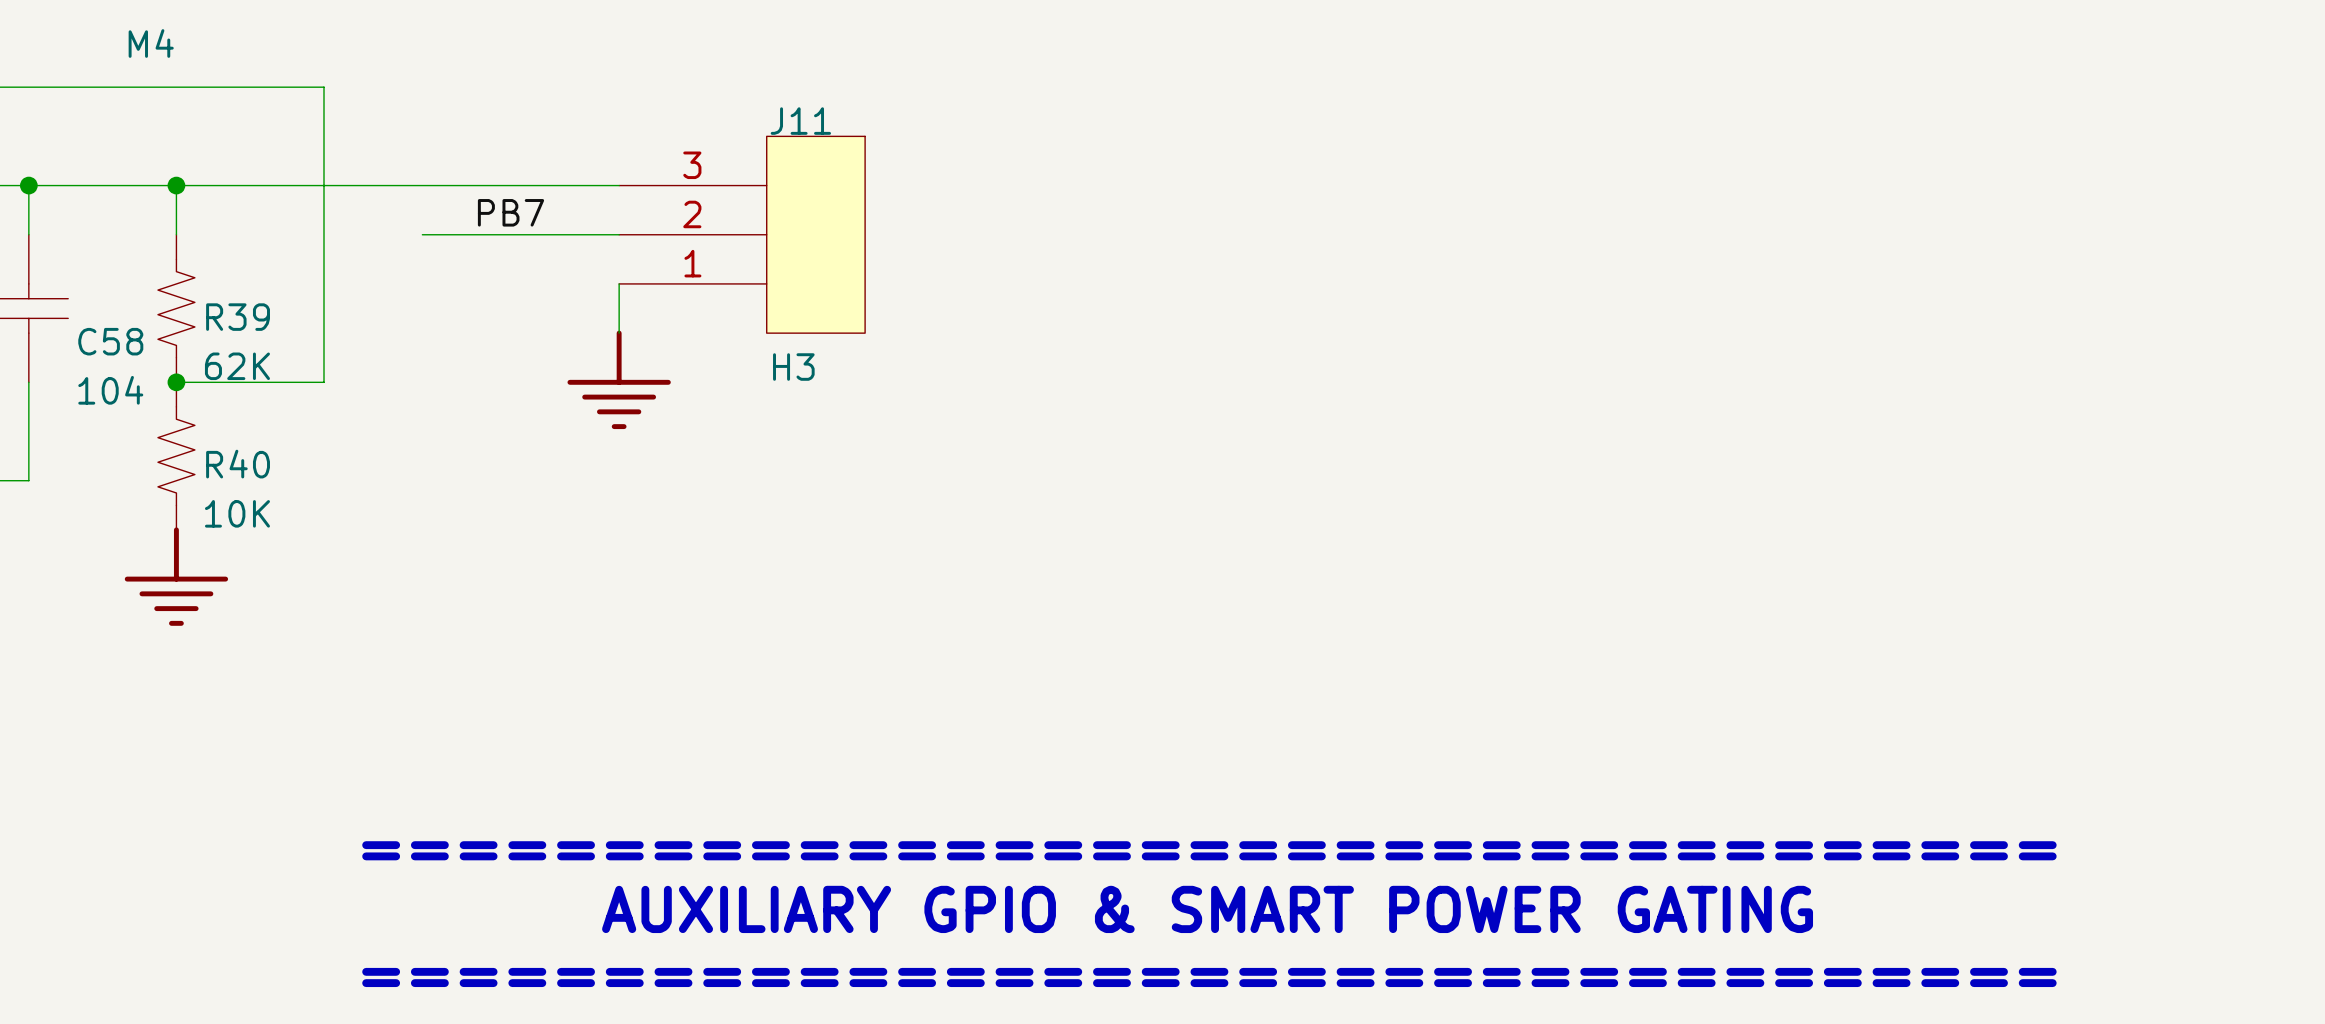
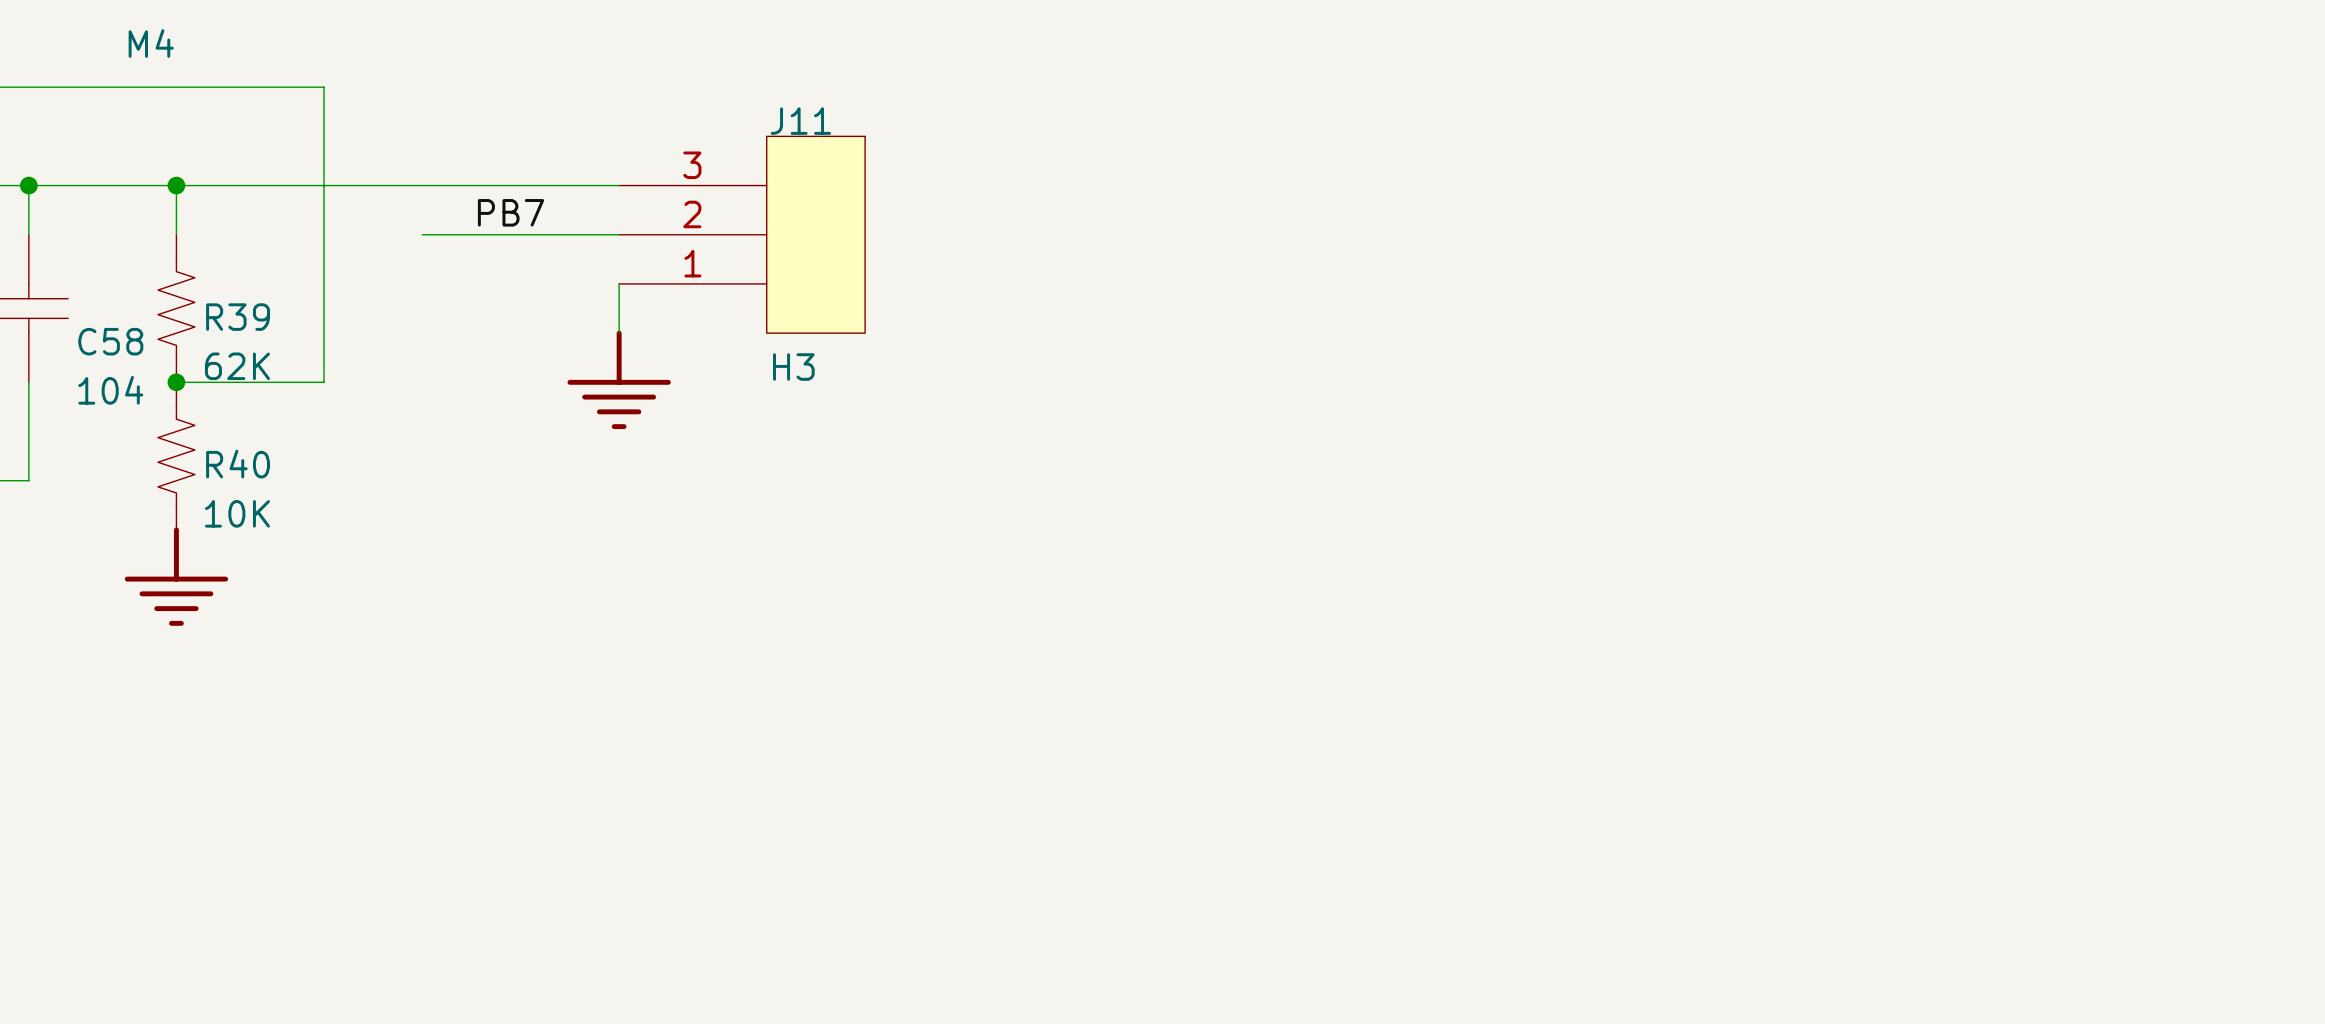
text: =================================== (1209, 850) -> none
text: AUXILIARY GPIO & SMART POWER GATING (1207, 909) -> none
text: =================================== (1209, 977) -> none

